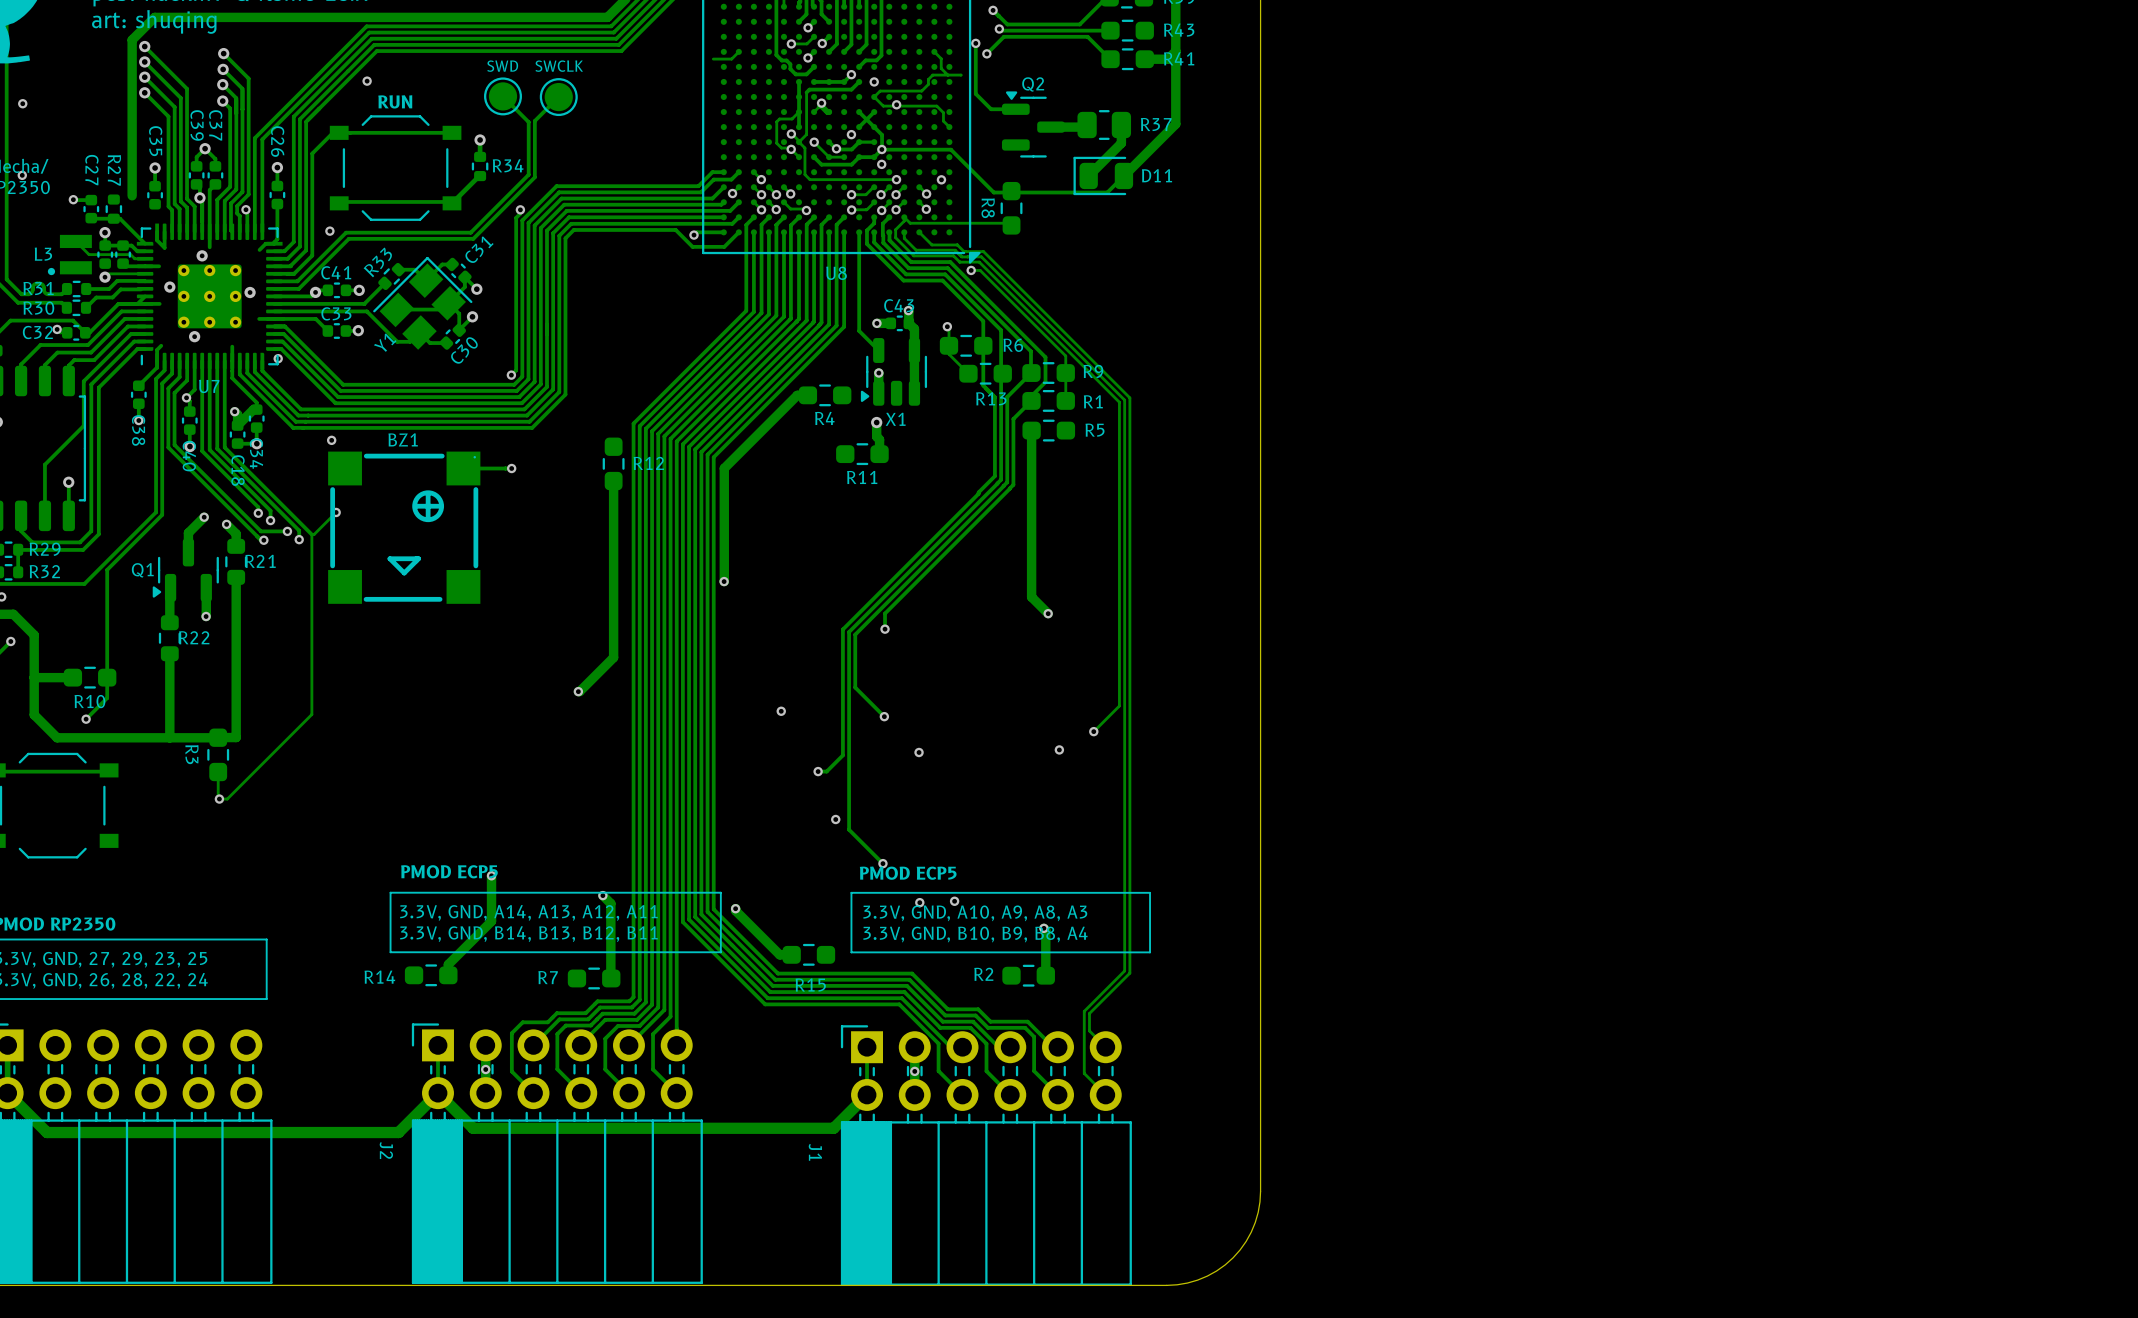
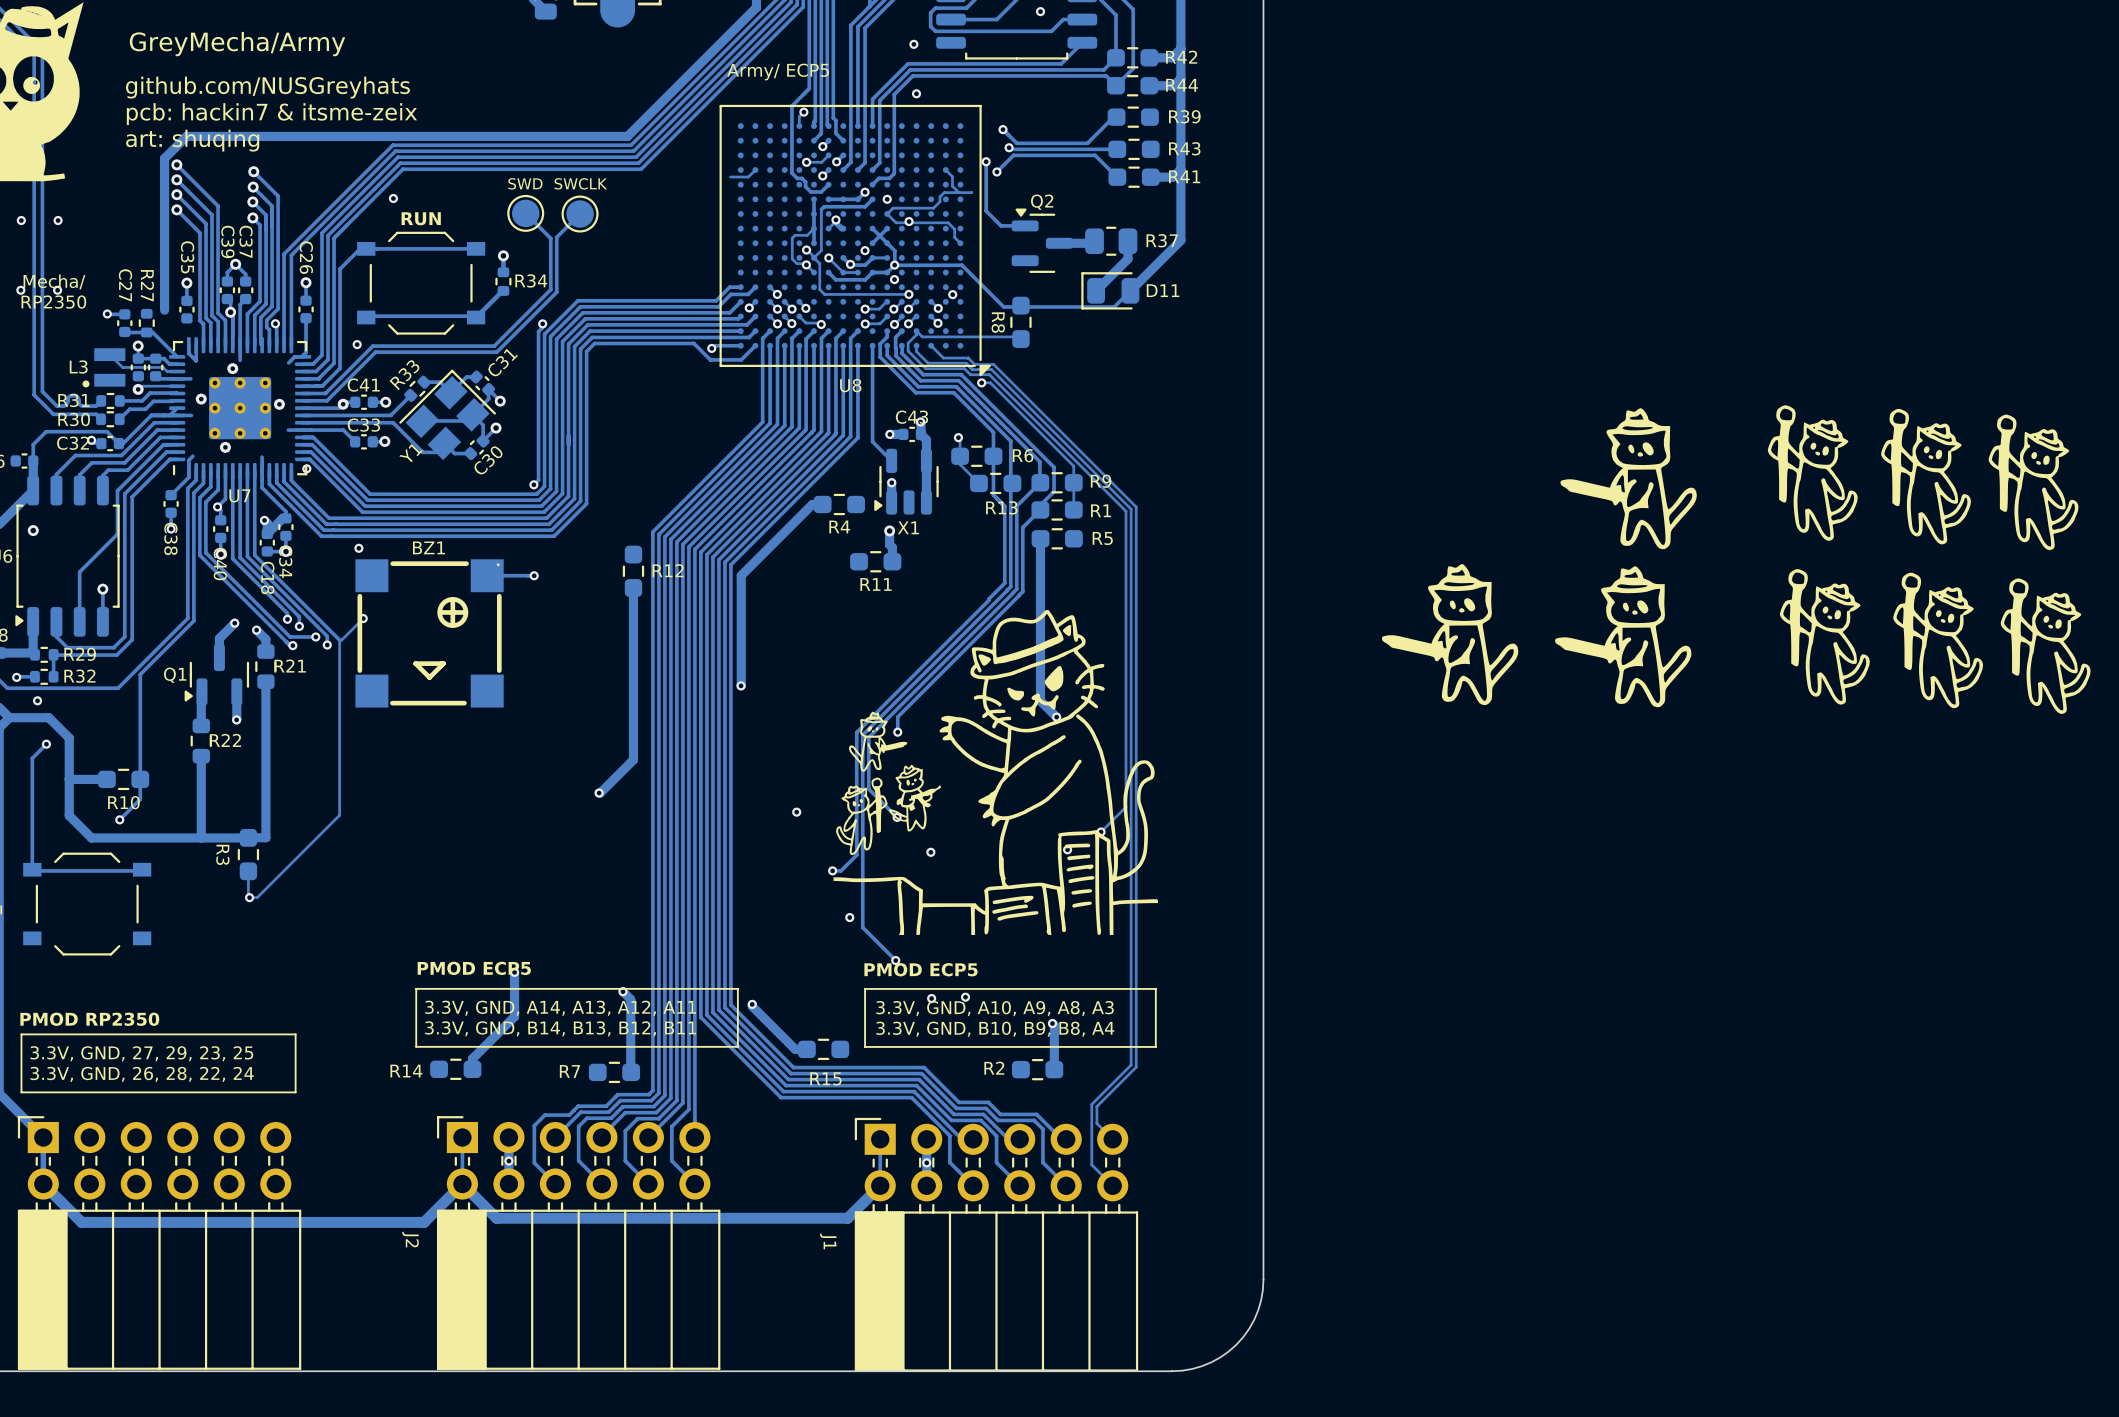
drawing: none -> [1767, 405, 1858, 541]
drawing: none -> [1555, 408, 1697, 708]
drawing: none -> [1881, 408, 2079, 551]
drawing: none -> [1381, 564, 1519, 706]
drawing: none -> [1779, 569, 1870, 705]
drawing: none -> [1893, 572, 2091, 714]
drawing: none -> [833, 609, 1158, 936]

